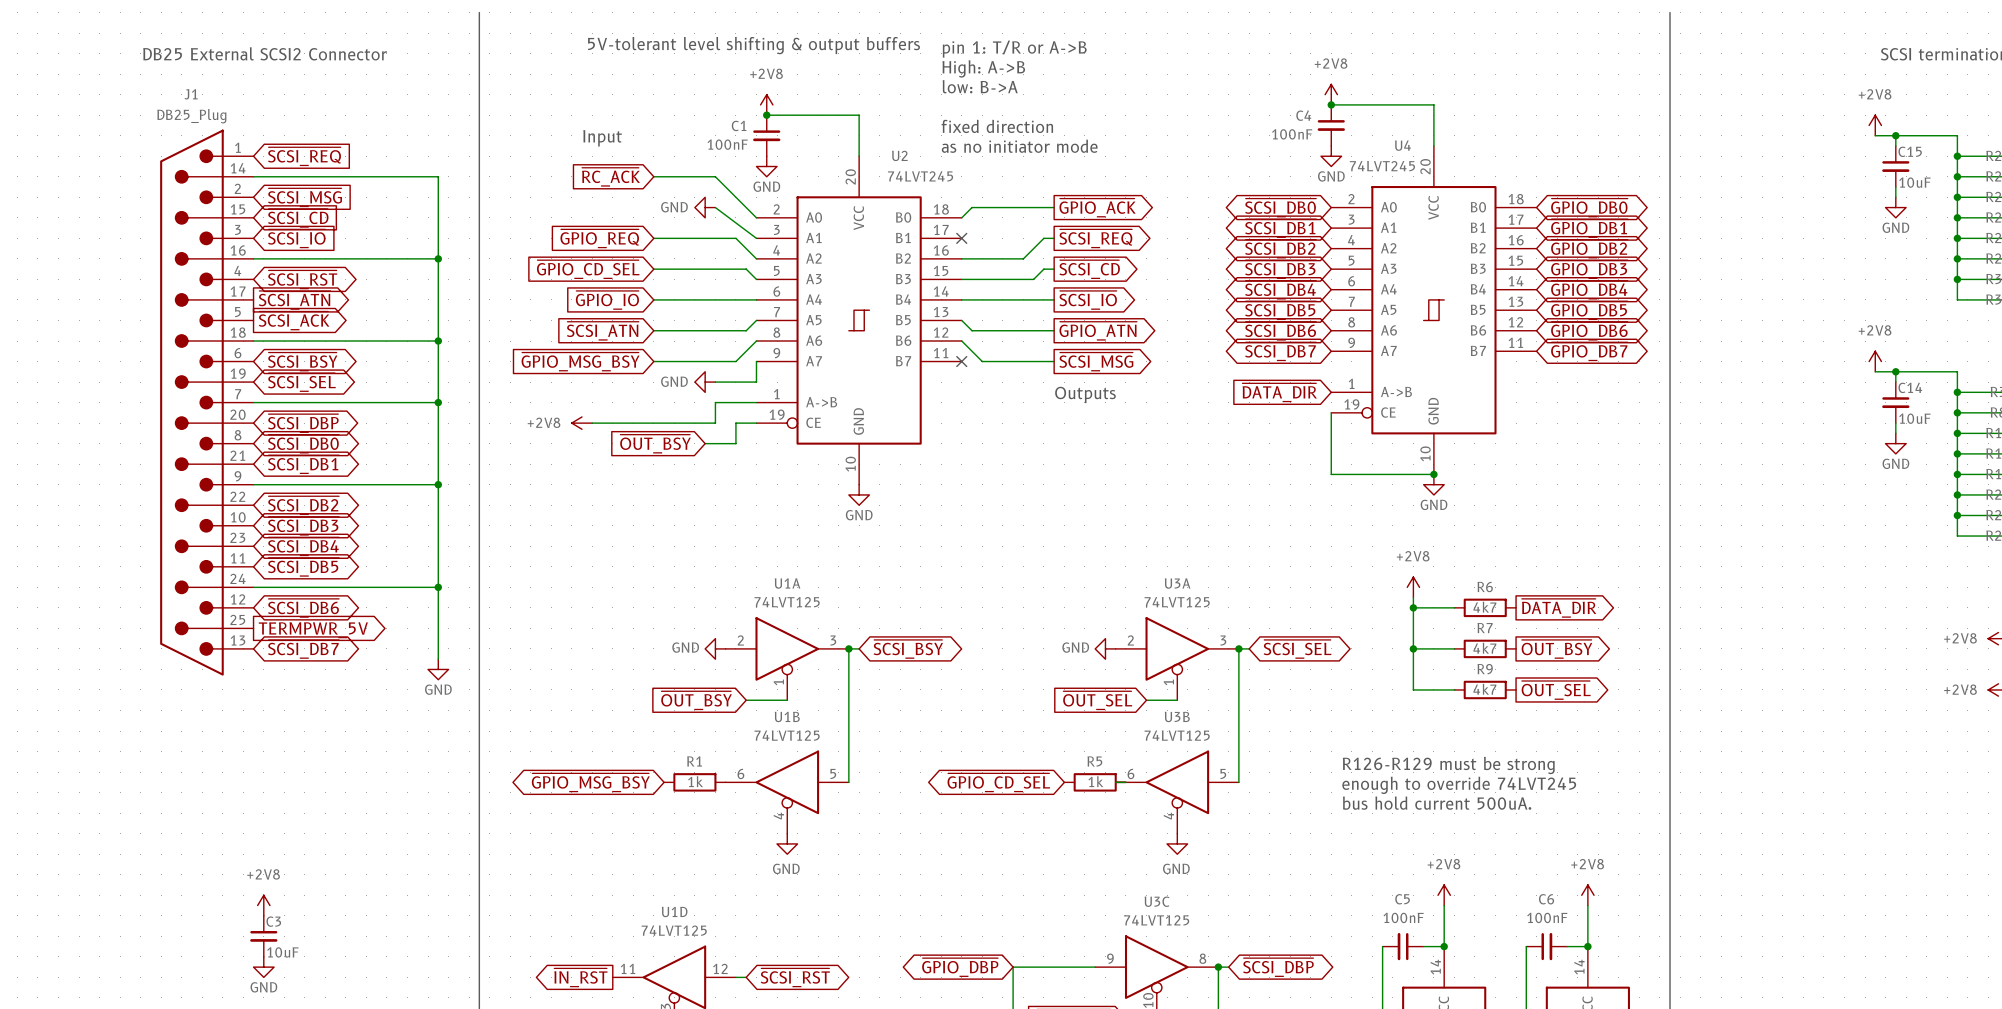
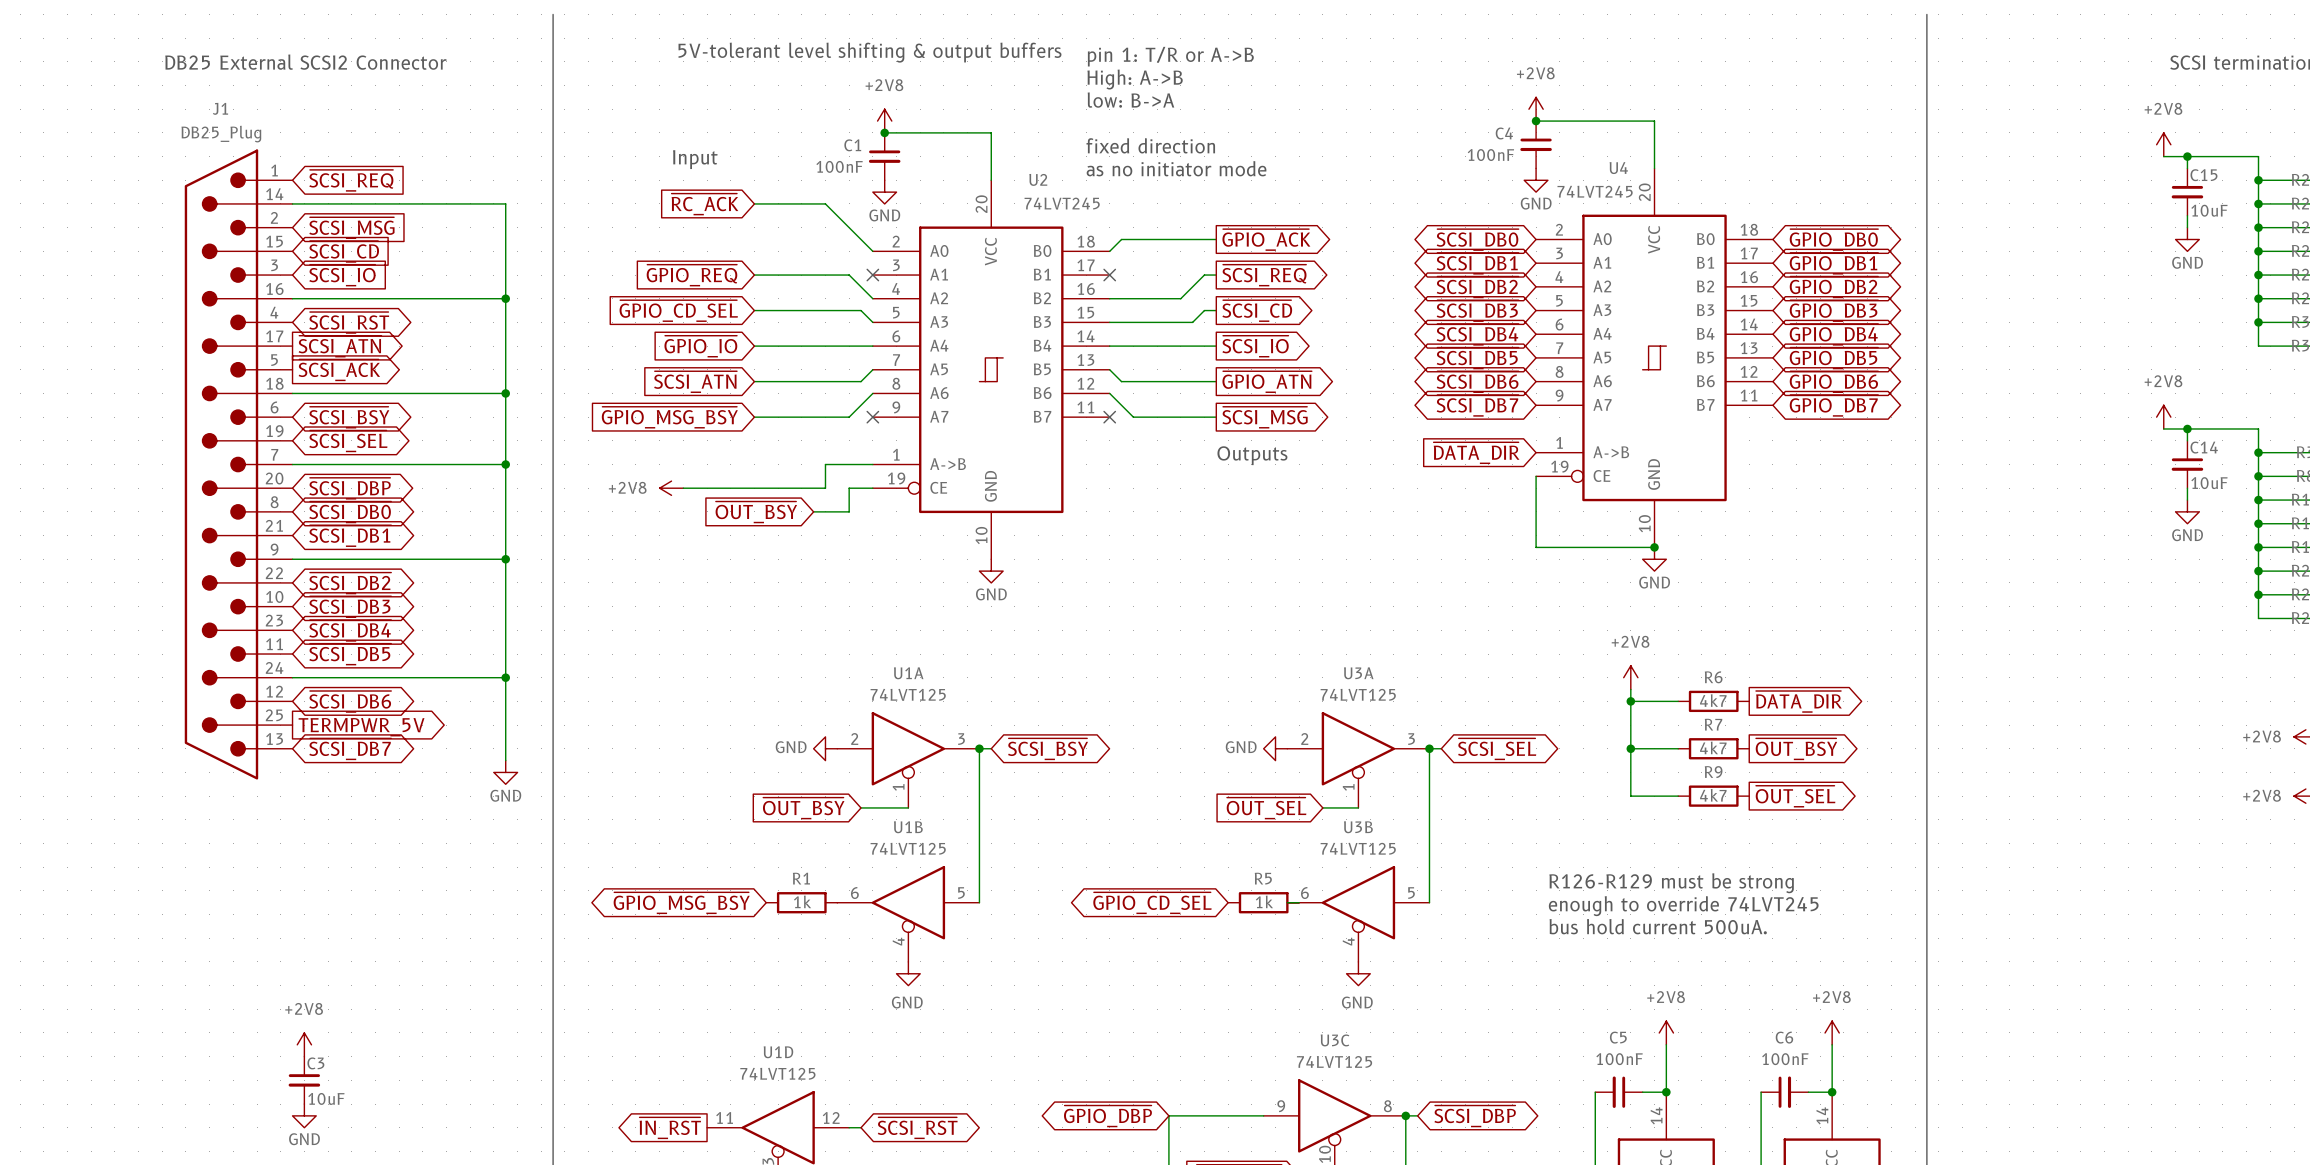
power symbol: GND (705, 207) -> none
wire: (715, 207) (756, 238) -> none
no-connect mark: none -> (872, 275)
wire: (756, 361) (756, 382) (715, 382) -> none
no-connect mark: none -> (872, 417)
power symbol: GND (705, 382) -> none

